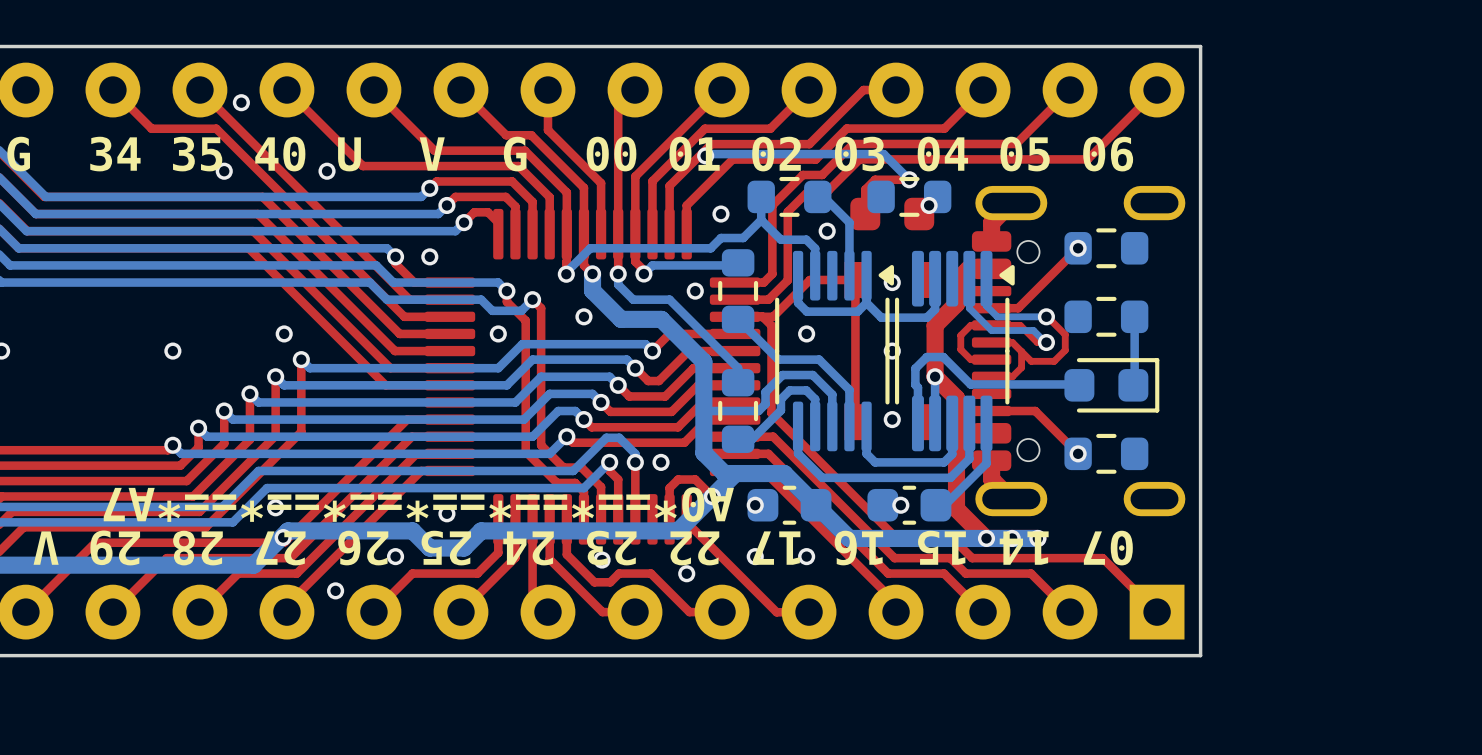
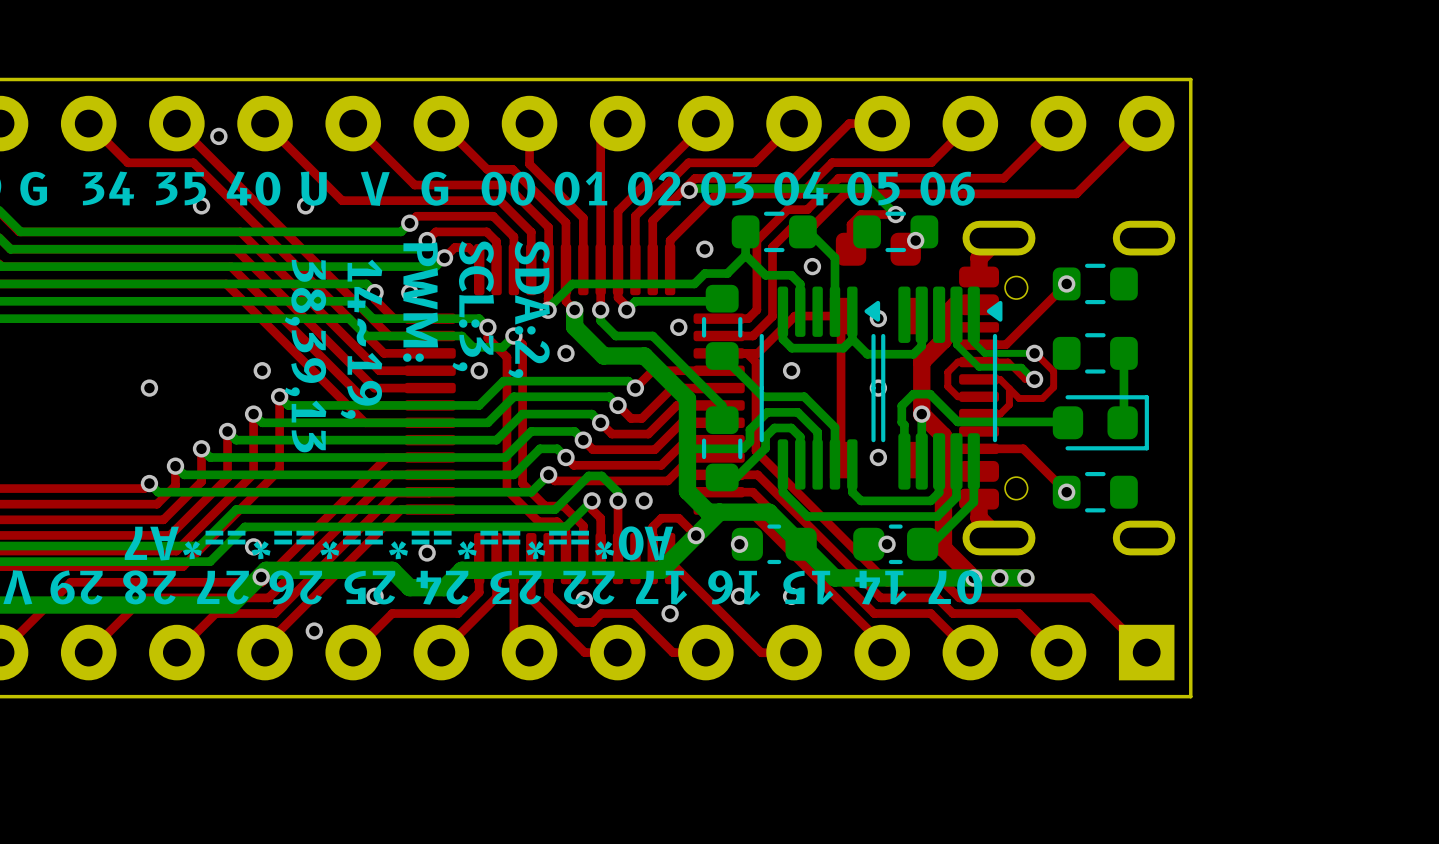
text: none -> PWM: (420, 302)
text: none -> SCL:3, (473, 306)
text: none -> SDA:2, (529, 309)
text: none -> 14~19, (361, 339)
text: none -> 38,39,13 (305, 356)

